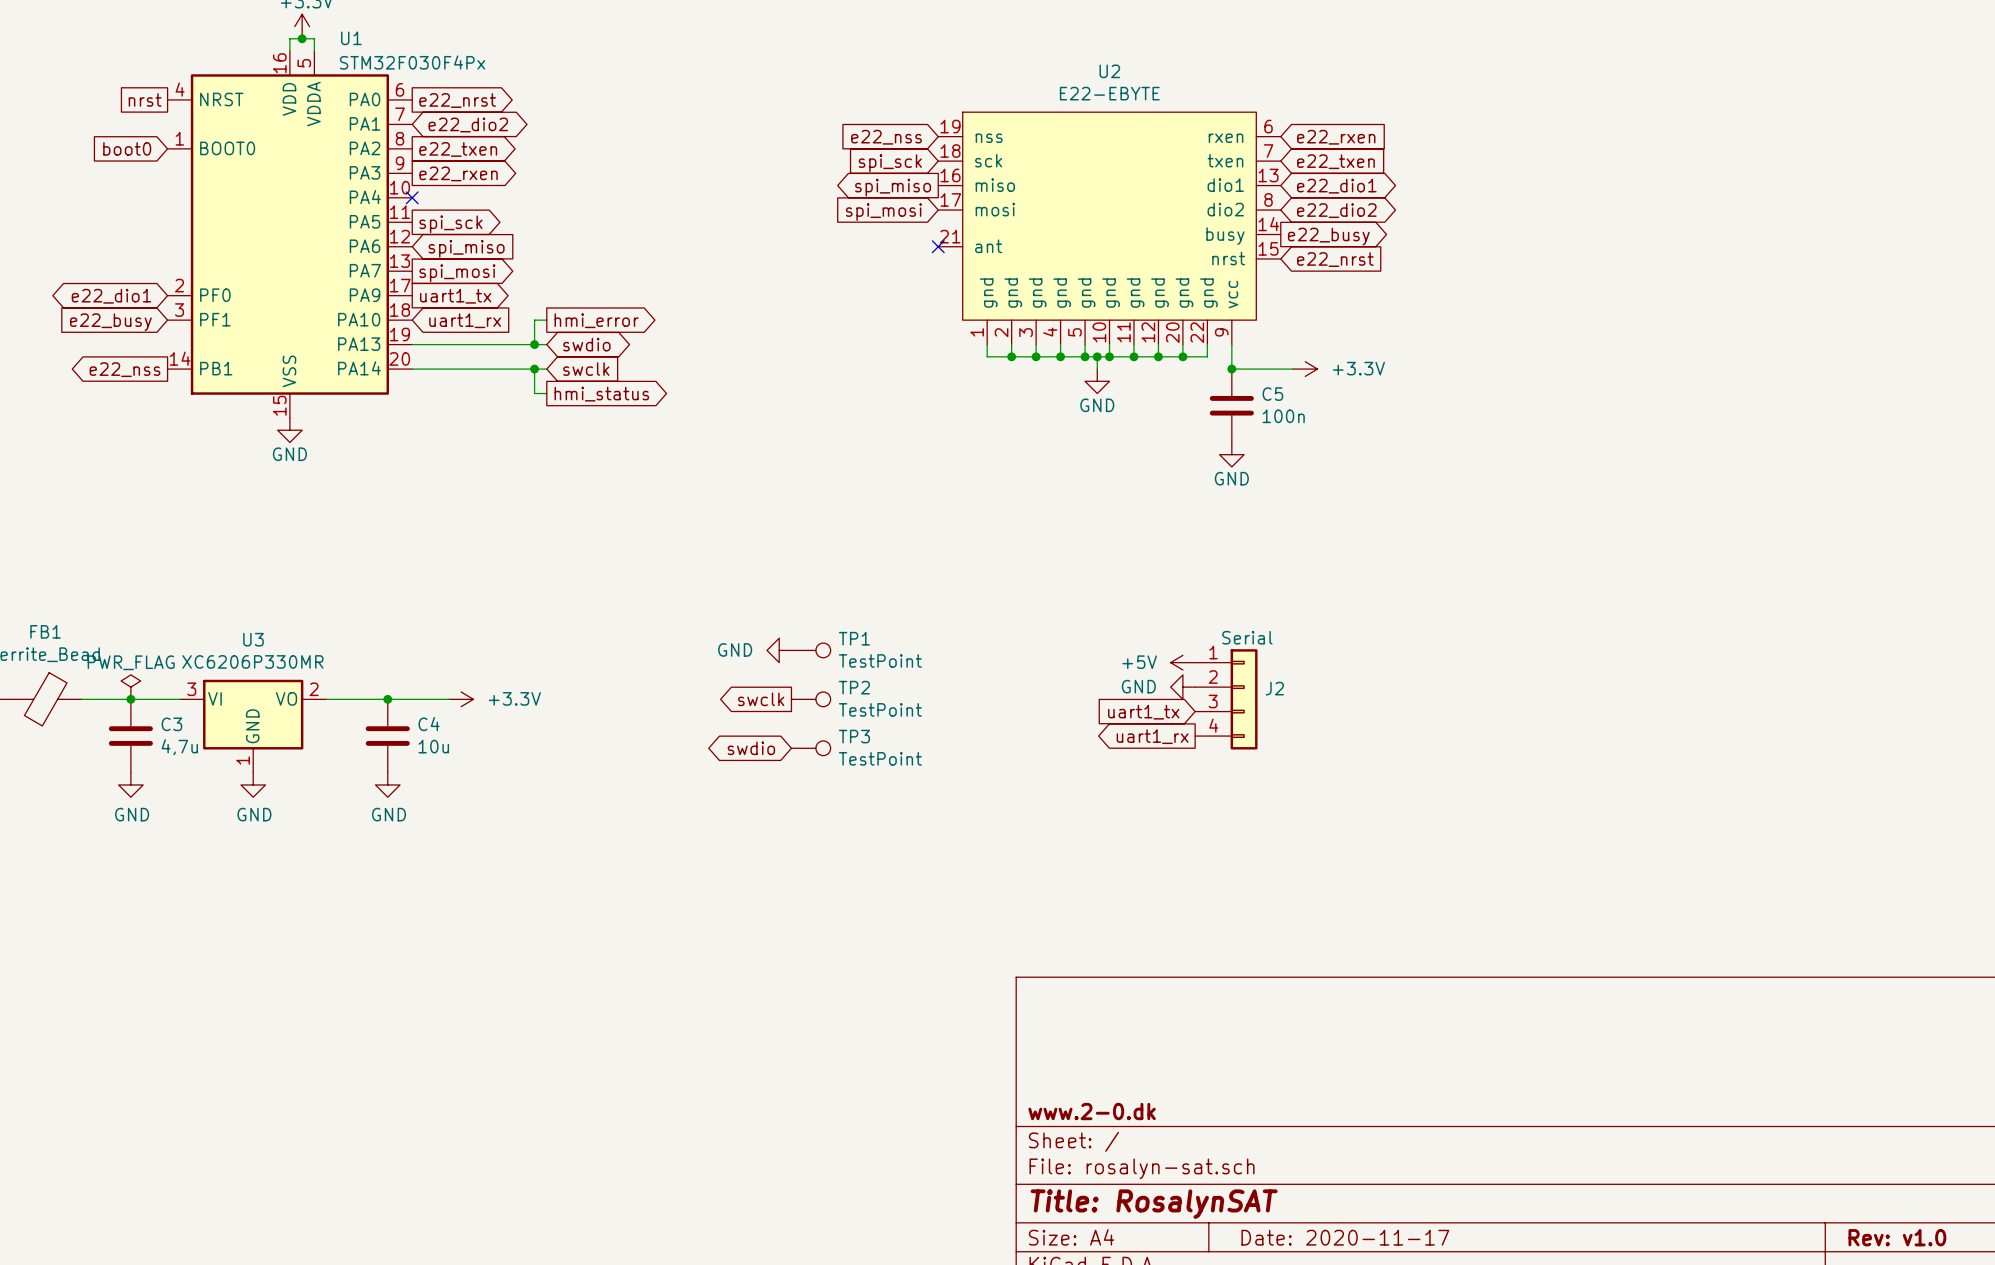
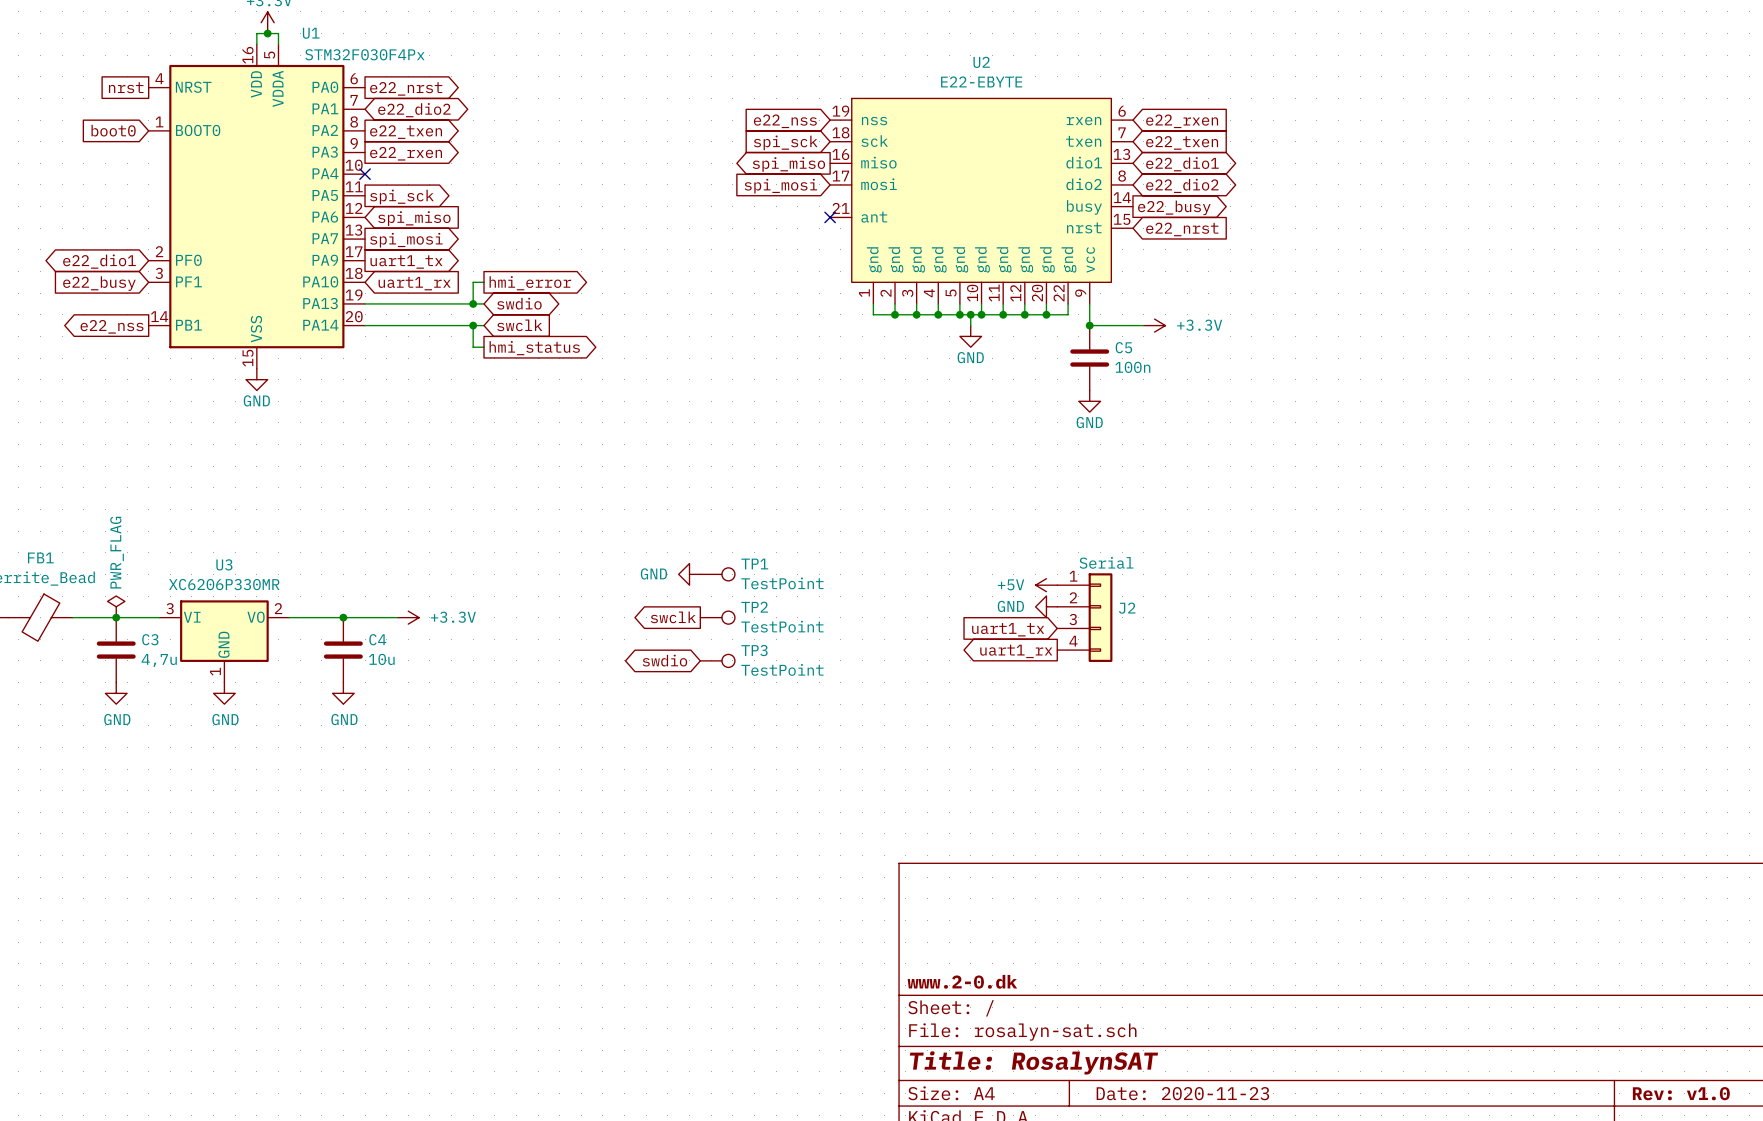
power symbol text rotation: 0° (131, 662) -> 90° counterclockwise (117, 552)
title block: Date: 2020-11-17 (1345, 1237) -> Date: 2020-11-23 (1182, 1093)

